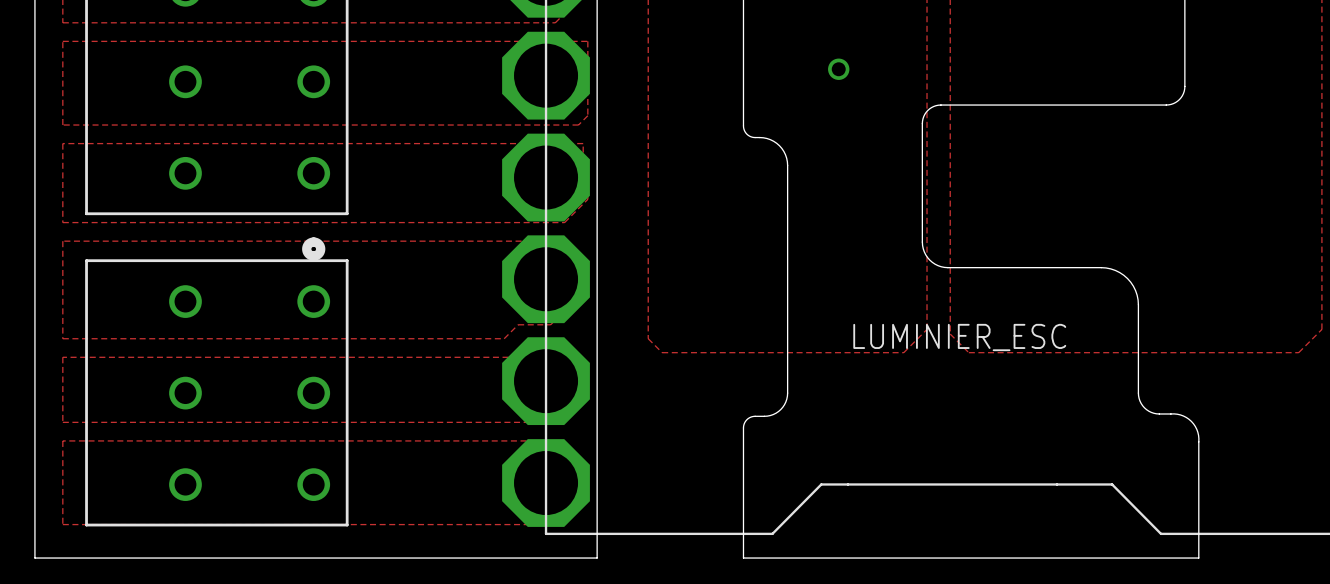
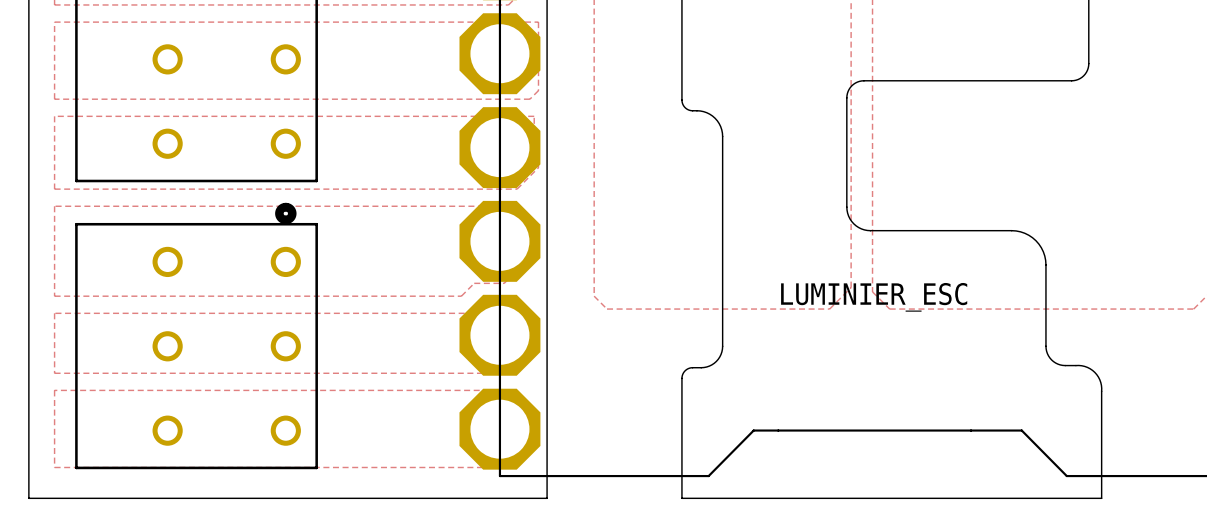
via: (838, 69) -> none

